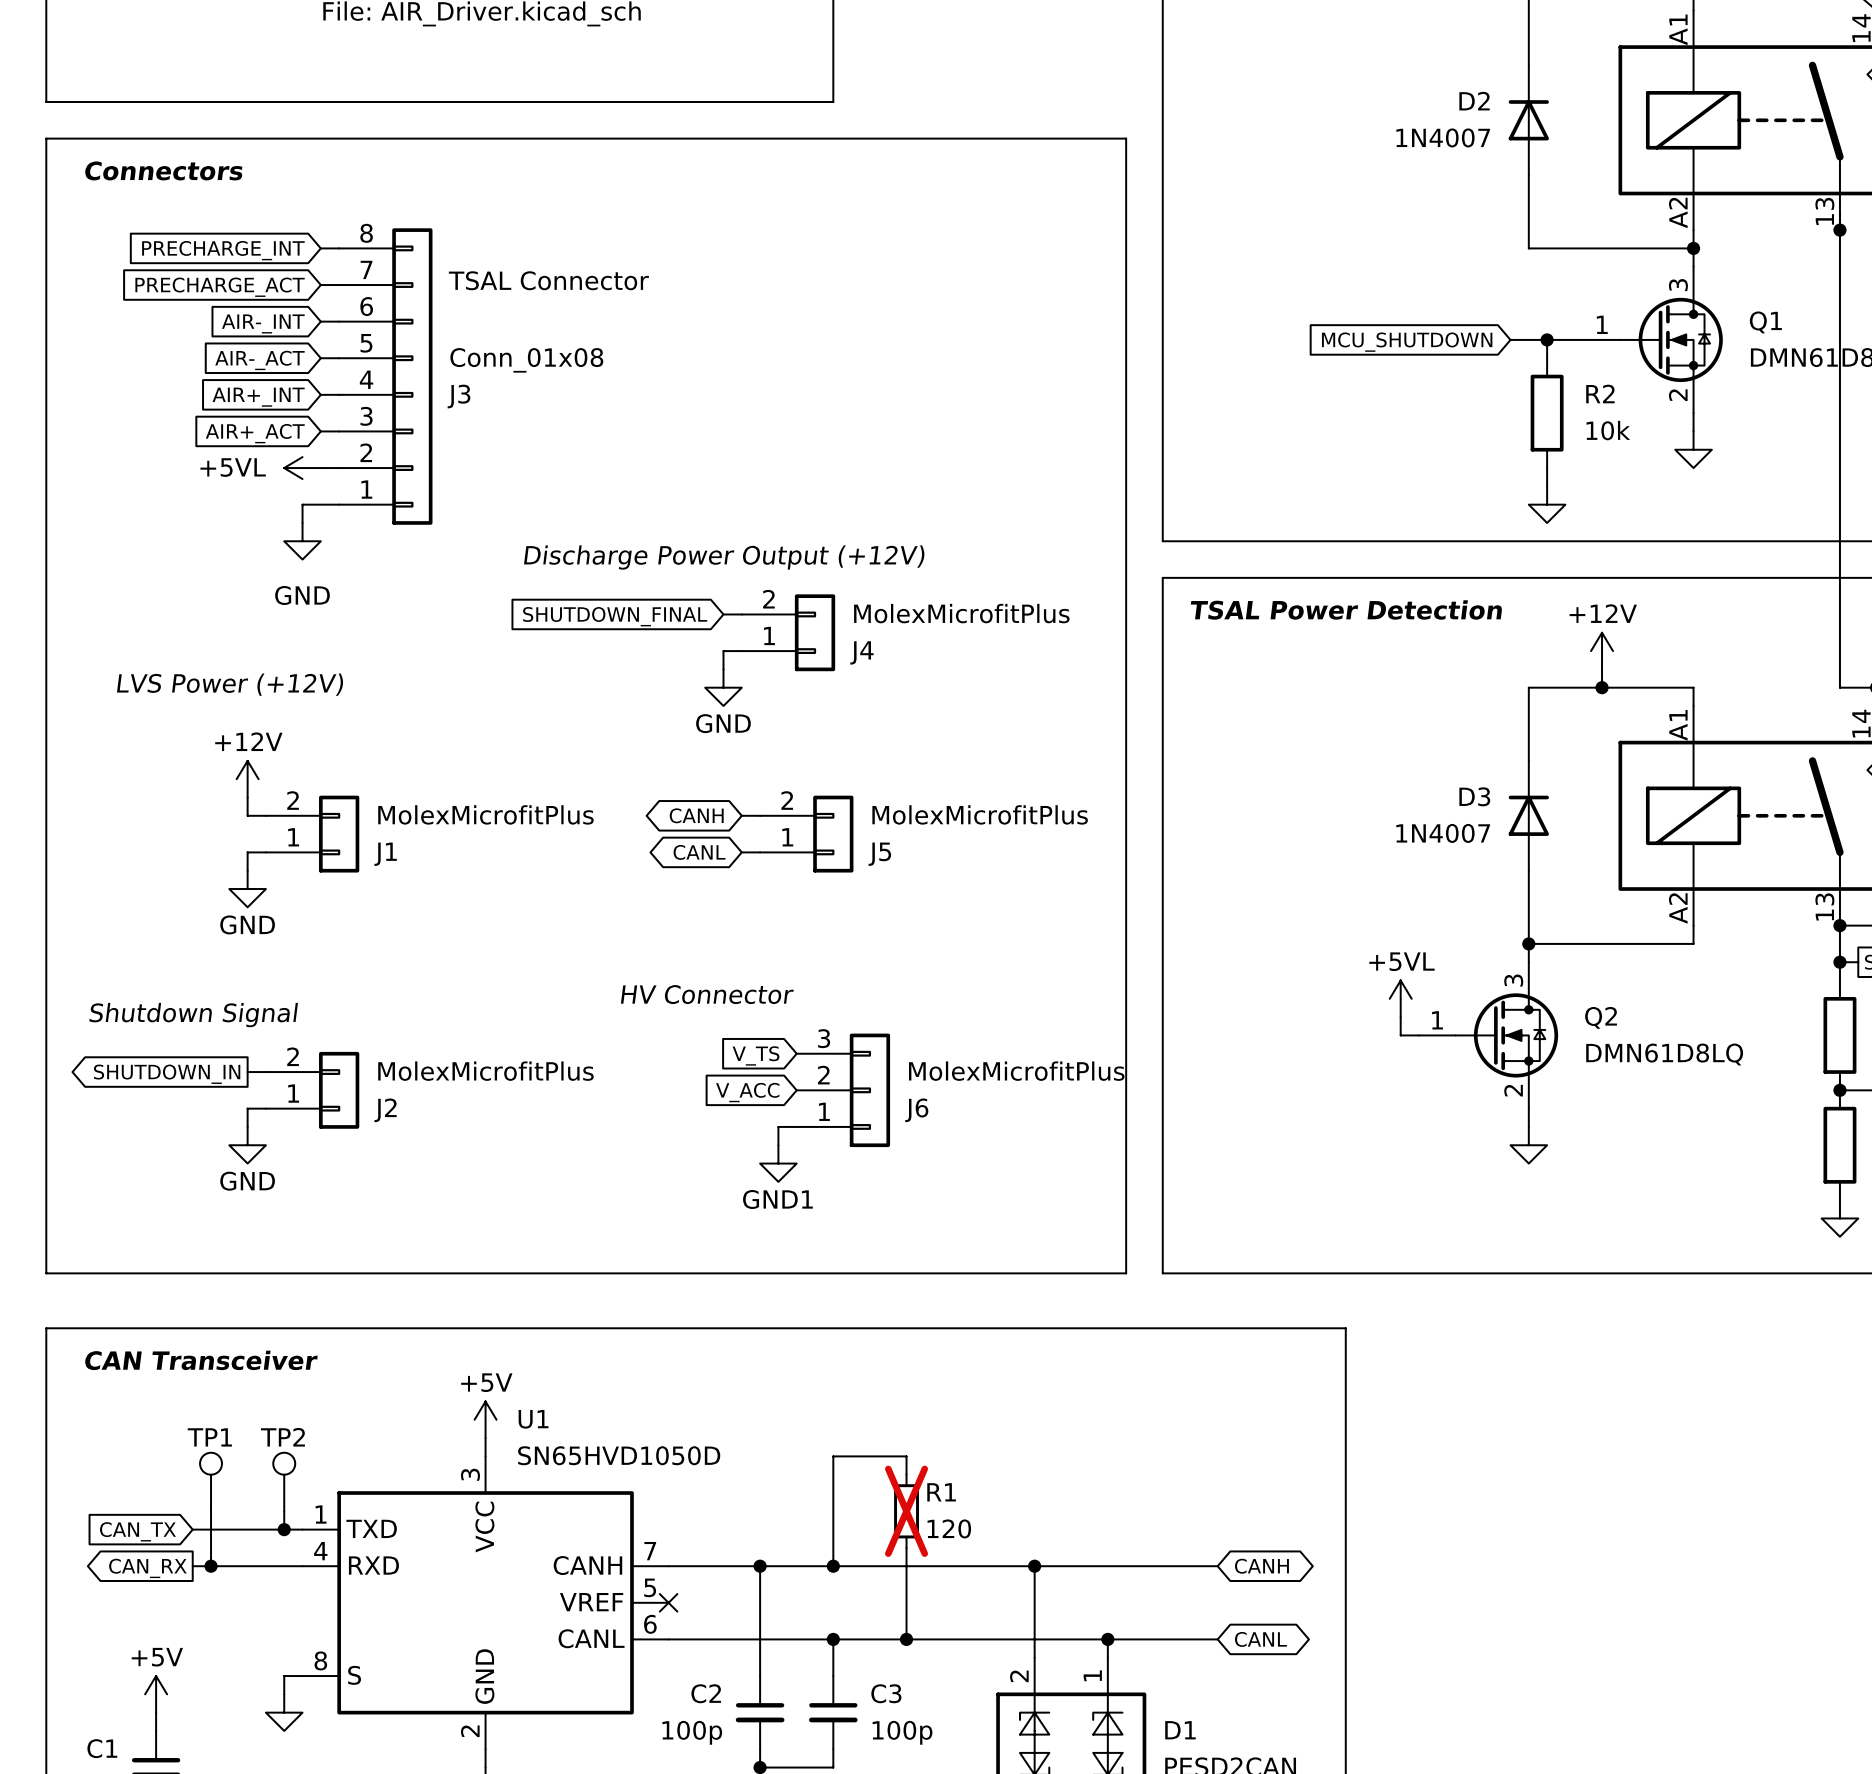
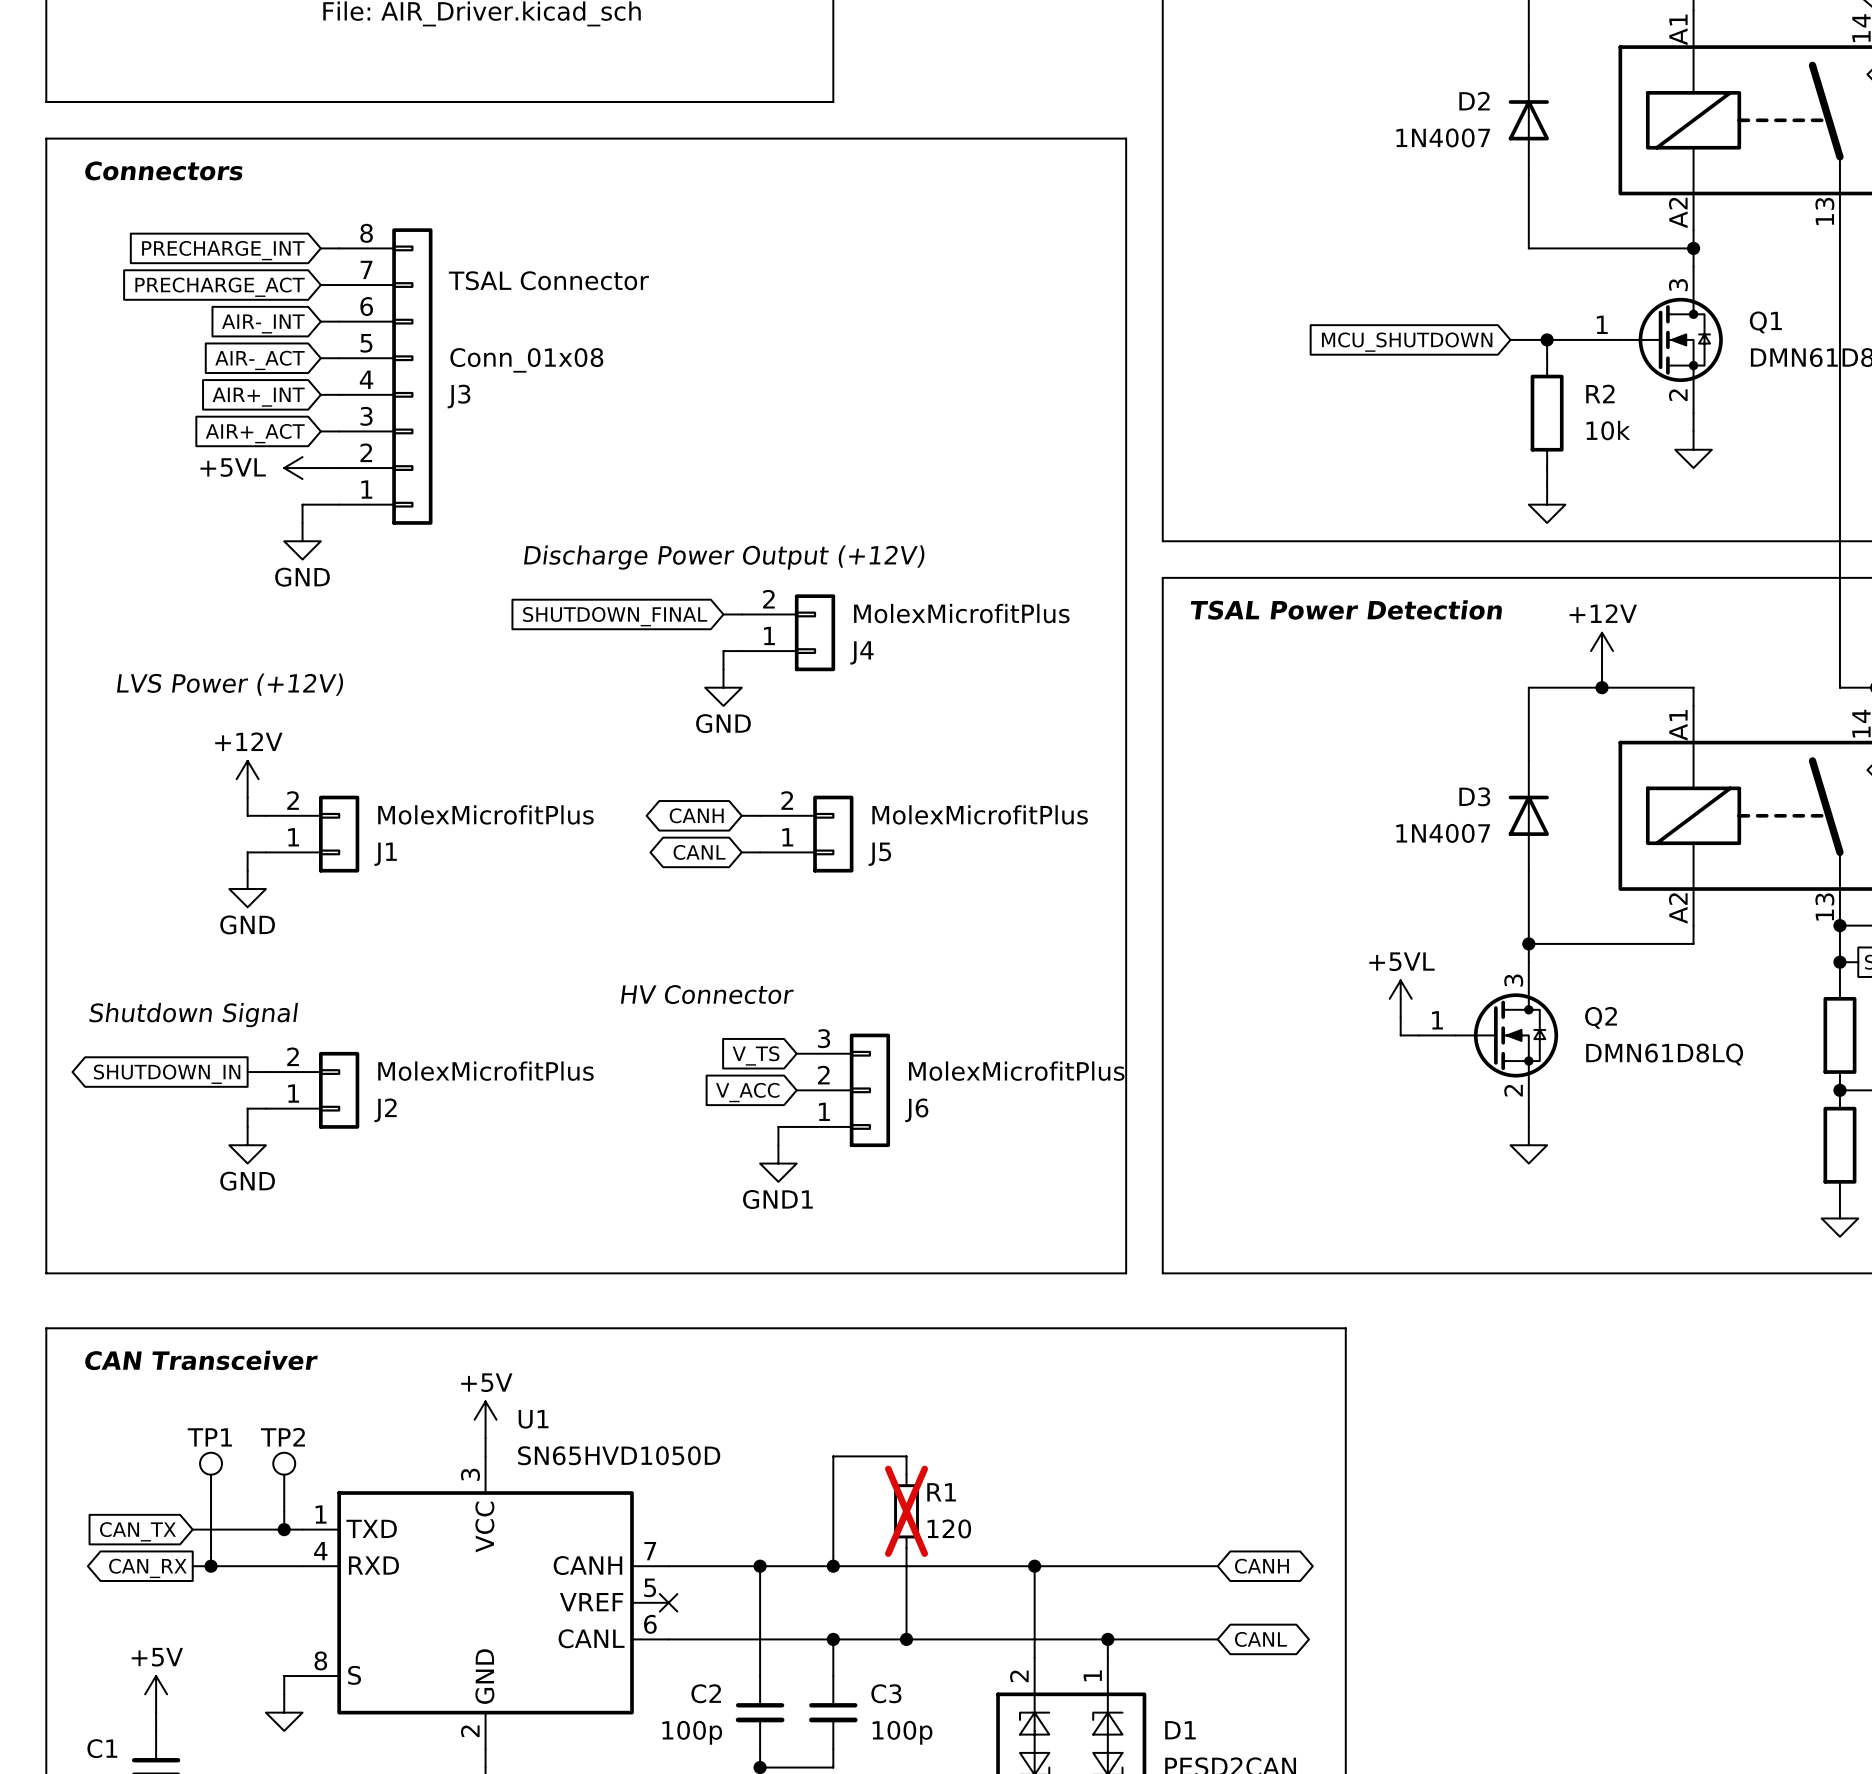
junction: (1839, 230) -> none
power symbol text position: GND (302, 595) -> GND (302, 577)

